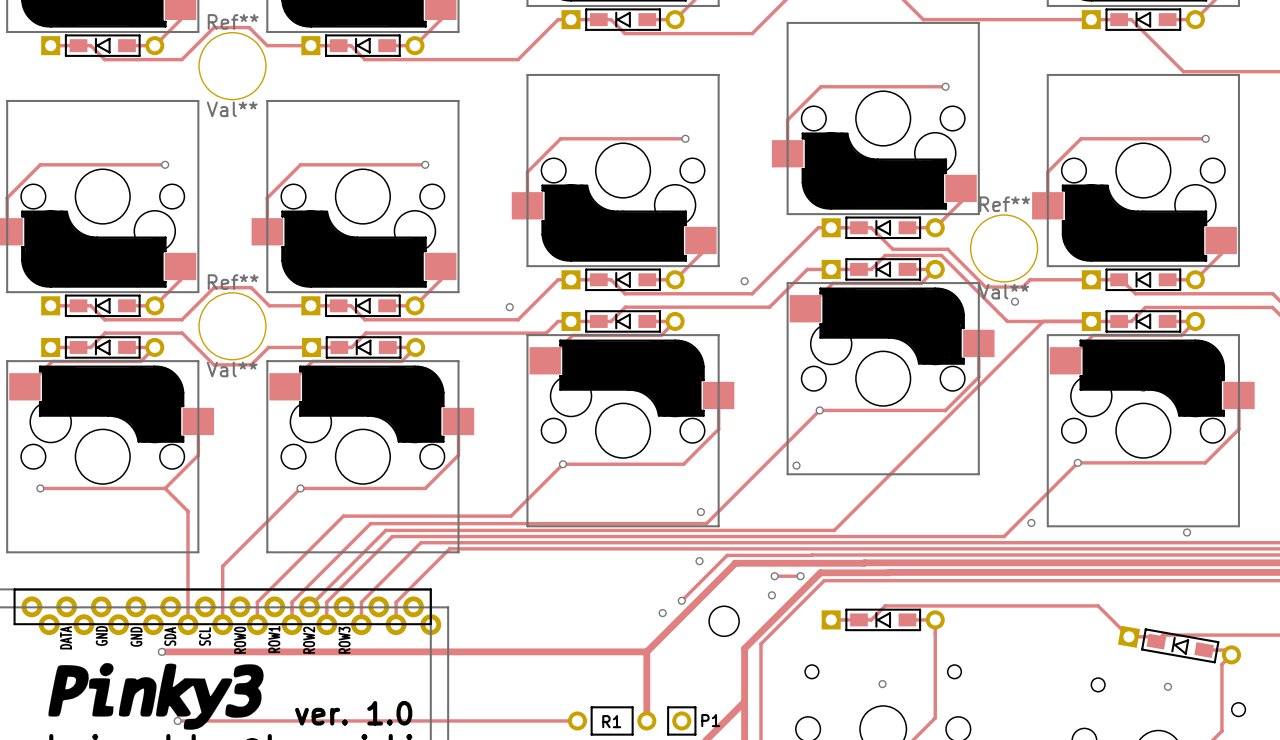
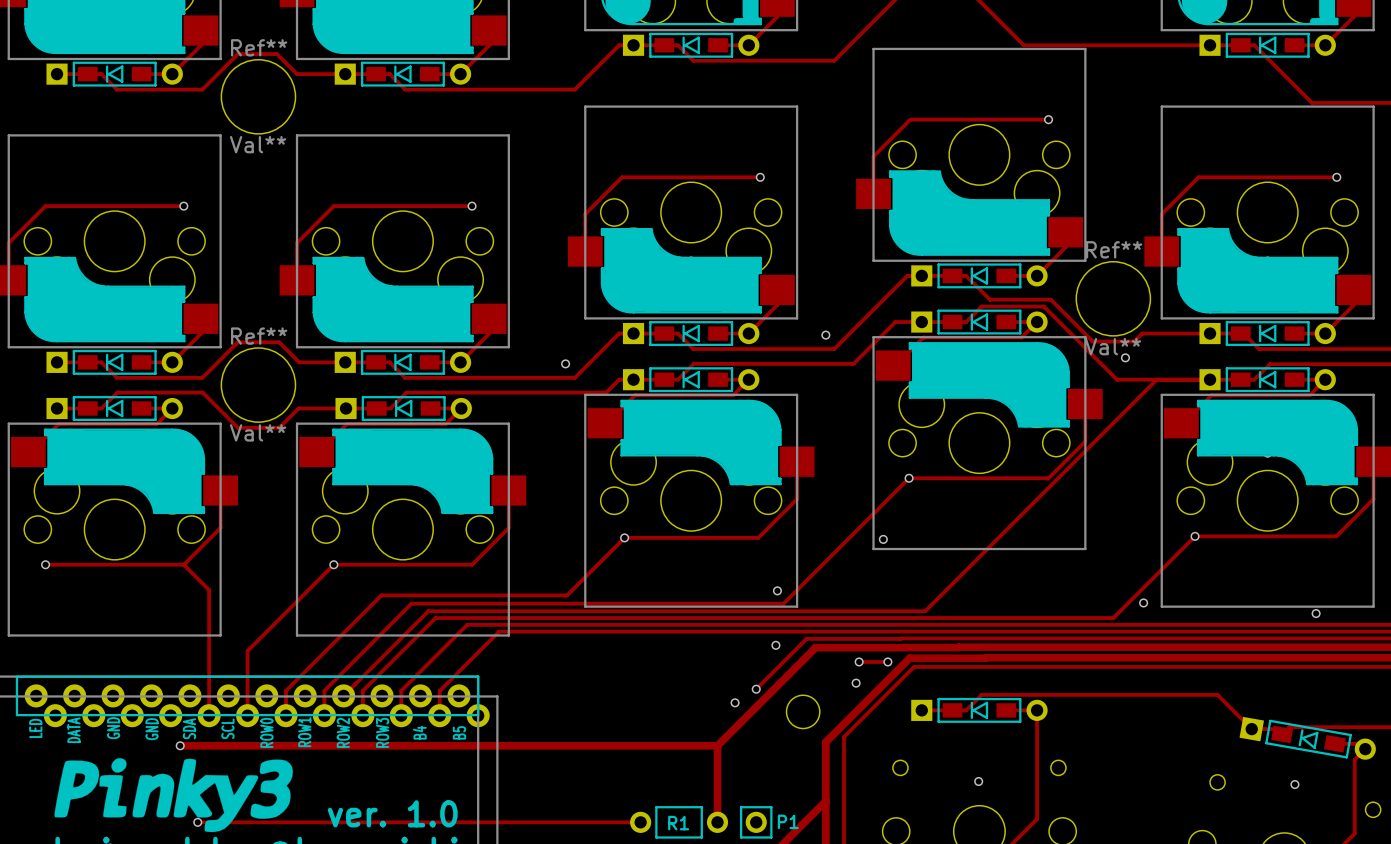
part text: none -> LED (35, 728)
part text: none -> B4 (419, 732)
part text: none -> B5 (459, 732)

